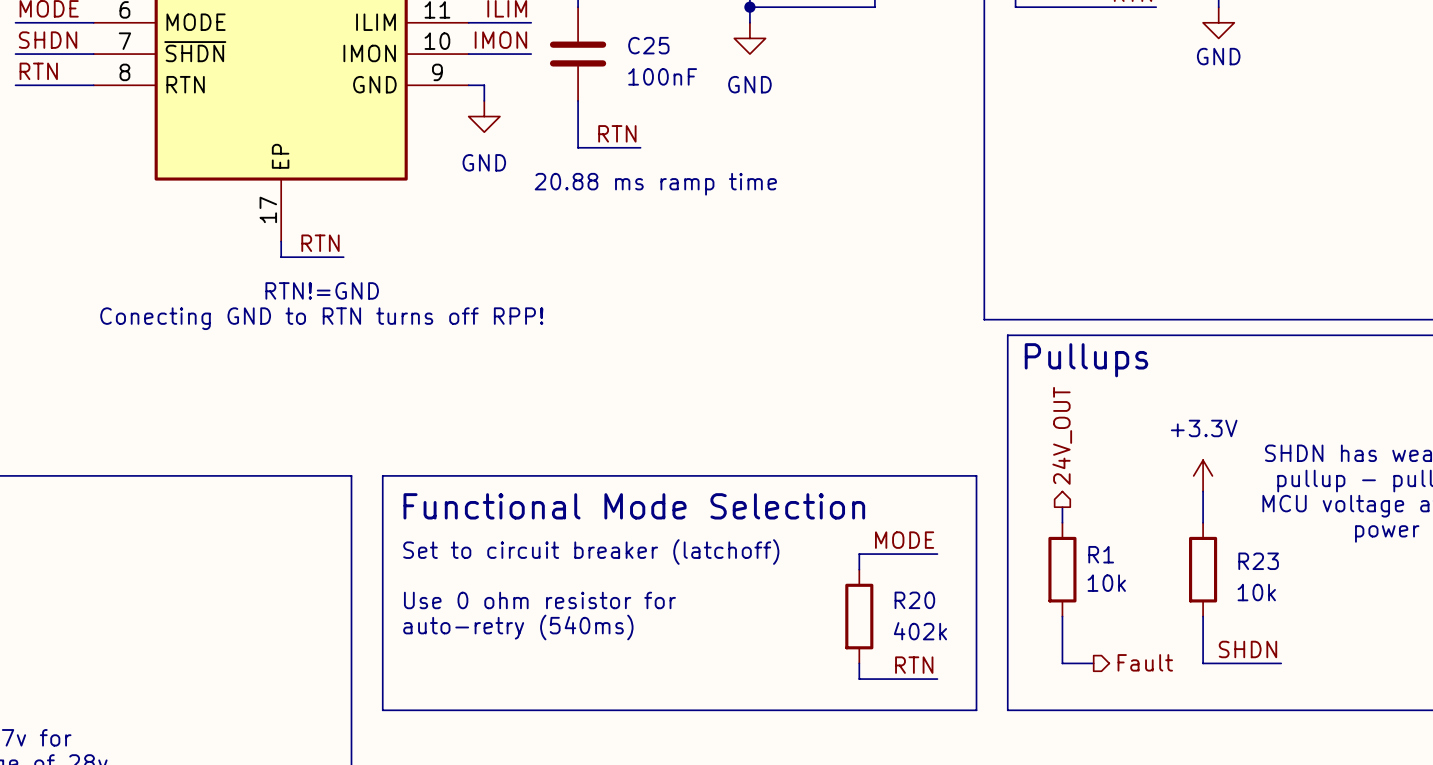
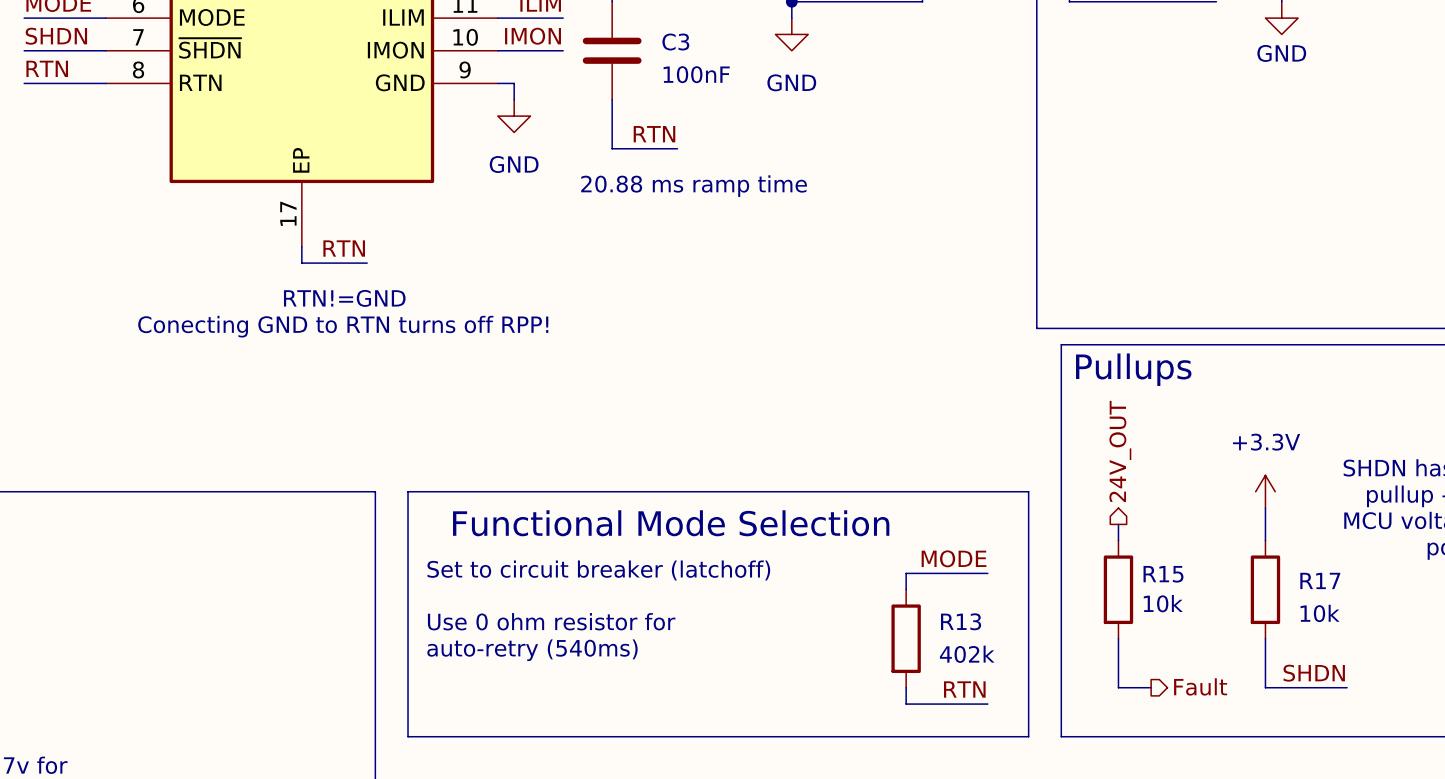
C25 name: C25 (648, 45) -> C3 (675, 42)
R1 name: R1 (1101, 554) -> R15 (1163, 574)
R23 name: R23 (1258, 561) -> R17 (1320, 580)
R20 name: R20 (914, 600) -> R13 (961, 621)

